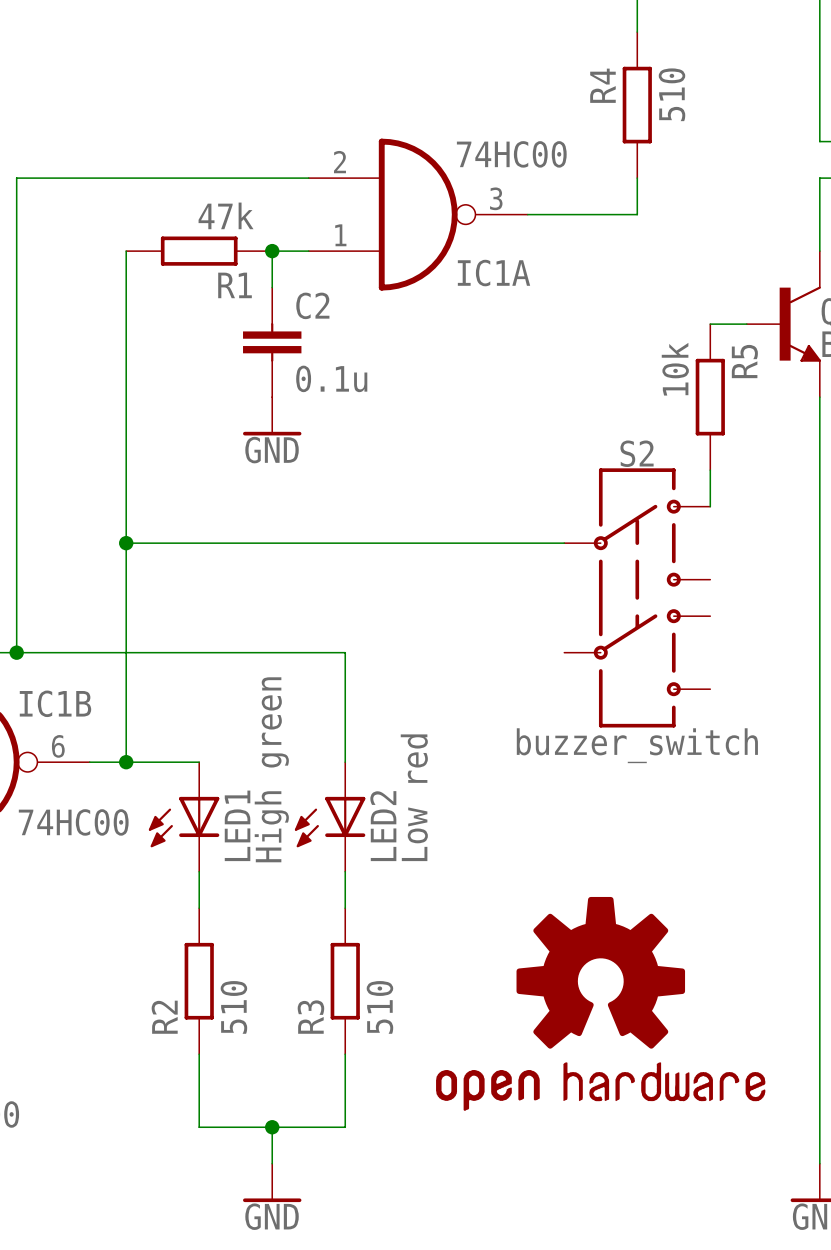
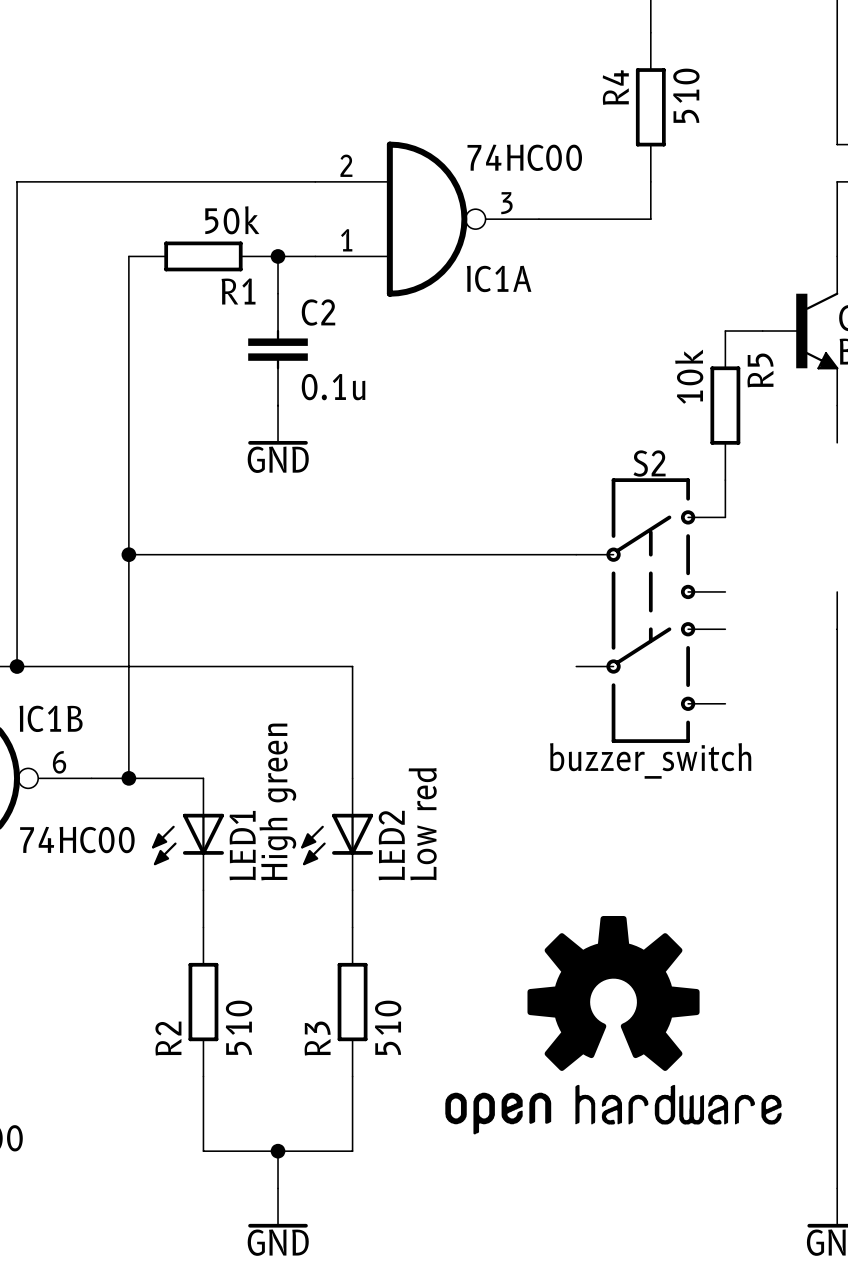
R1 value: 47k (226, 215) -> 50k (232, 220)
wire: (819, 433) (819, 579) -> none

